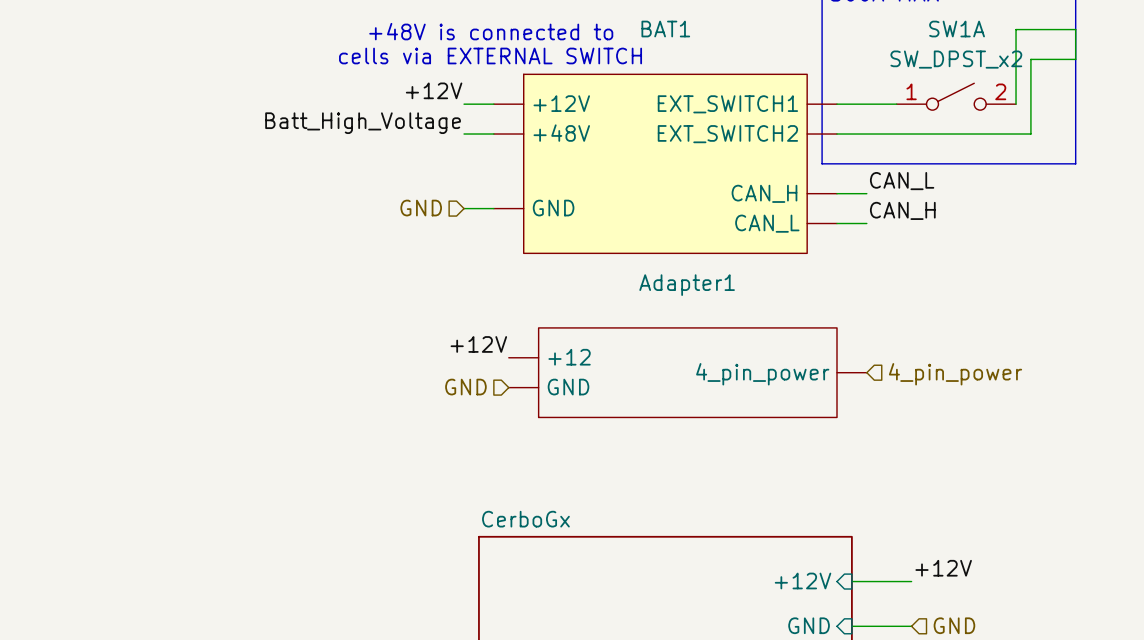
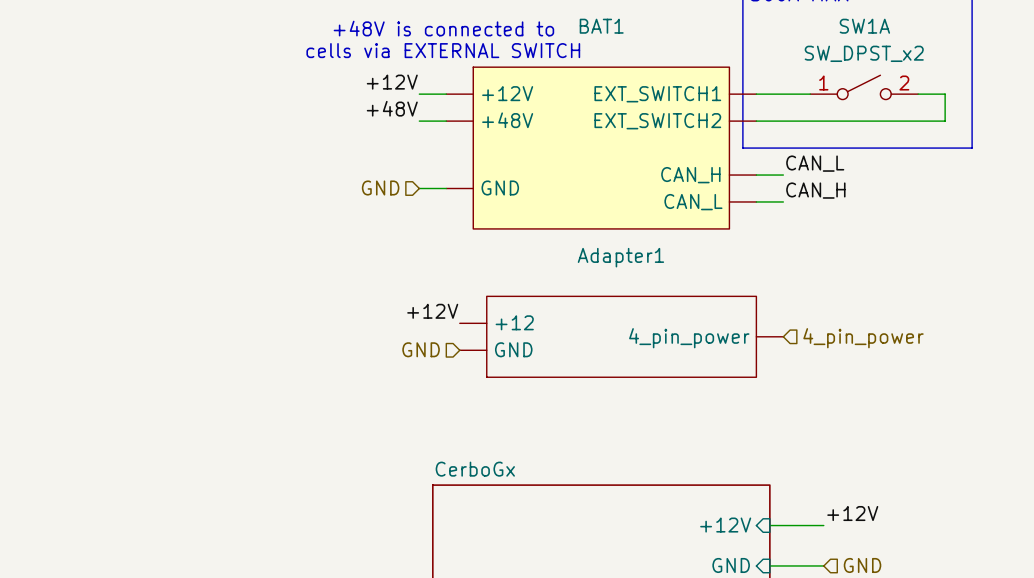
wire: (1016, 104) (1016, 29) (1075, 29) (1075, 59) (1030, 59) (1030, 134) -> (918, 94) (945, 94) (945, 121) (931, 121)
label: Batt_High_Voltage (363, 123) -> +48V (392, 108)

